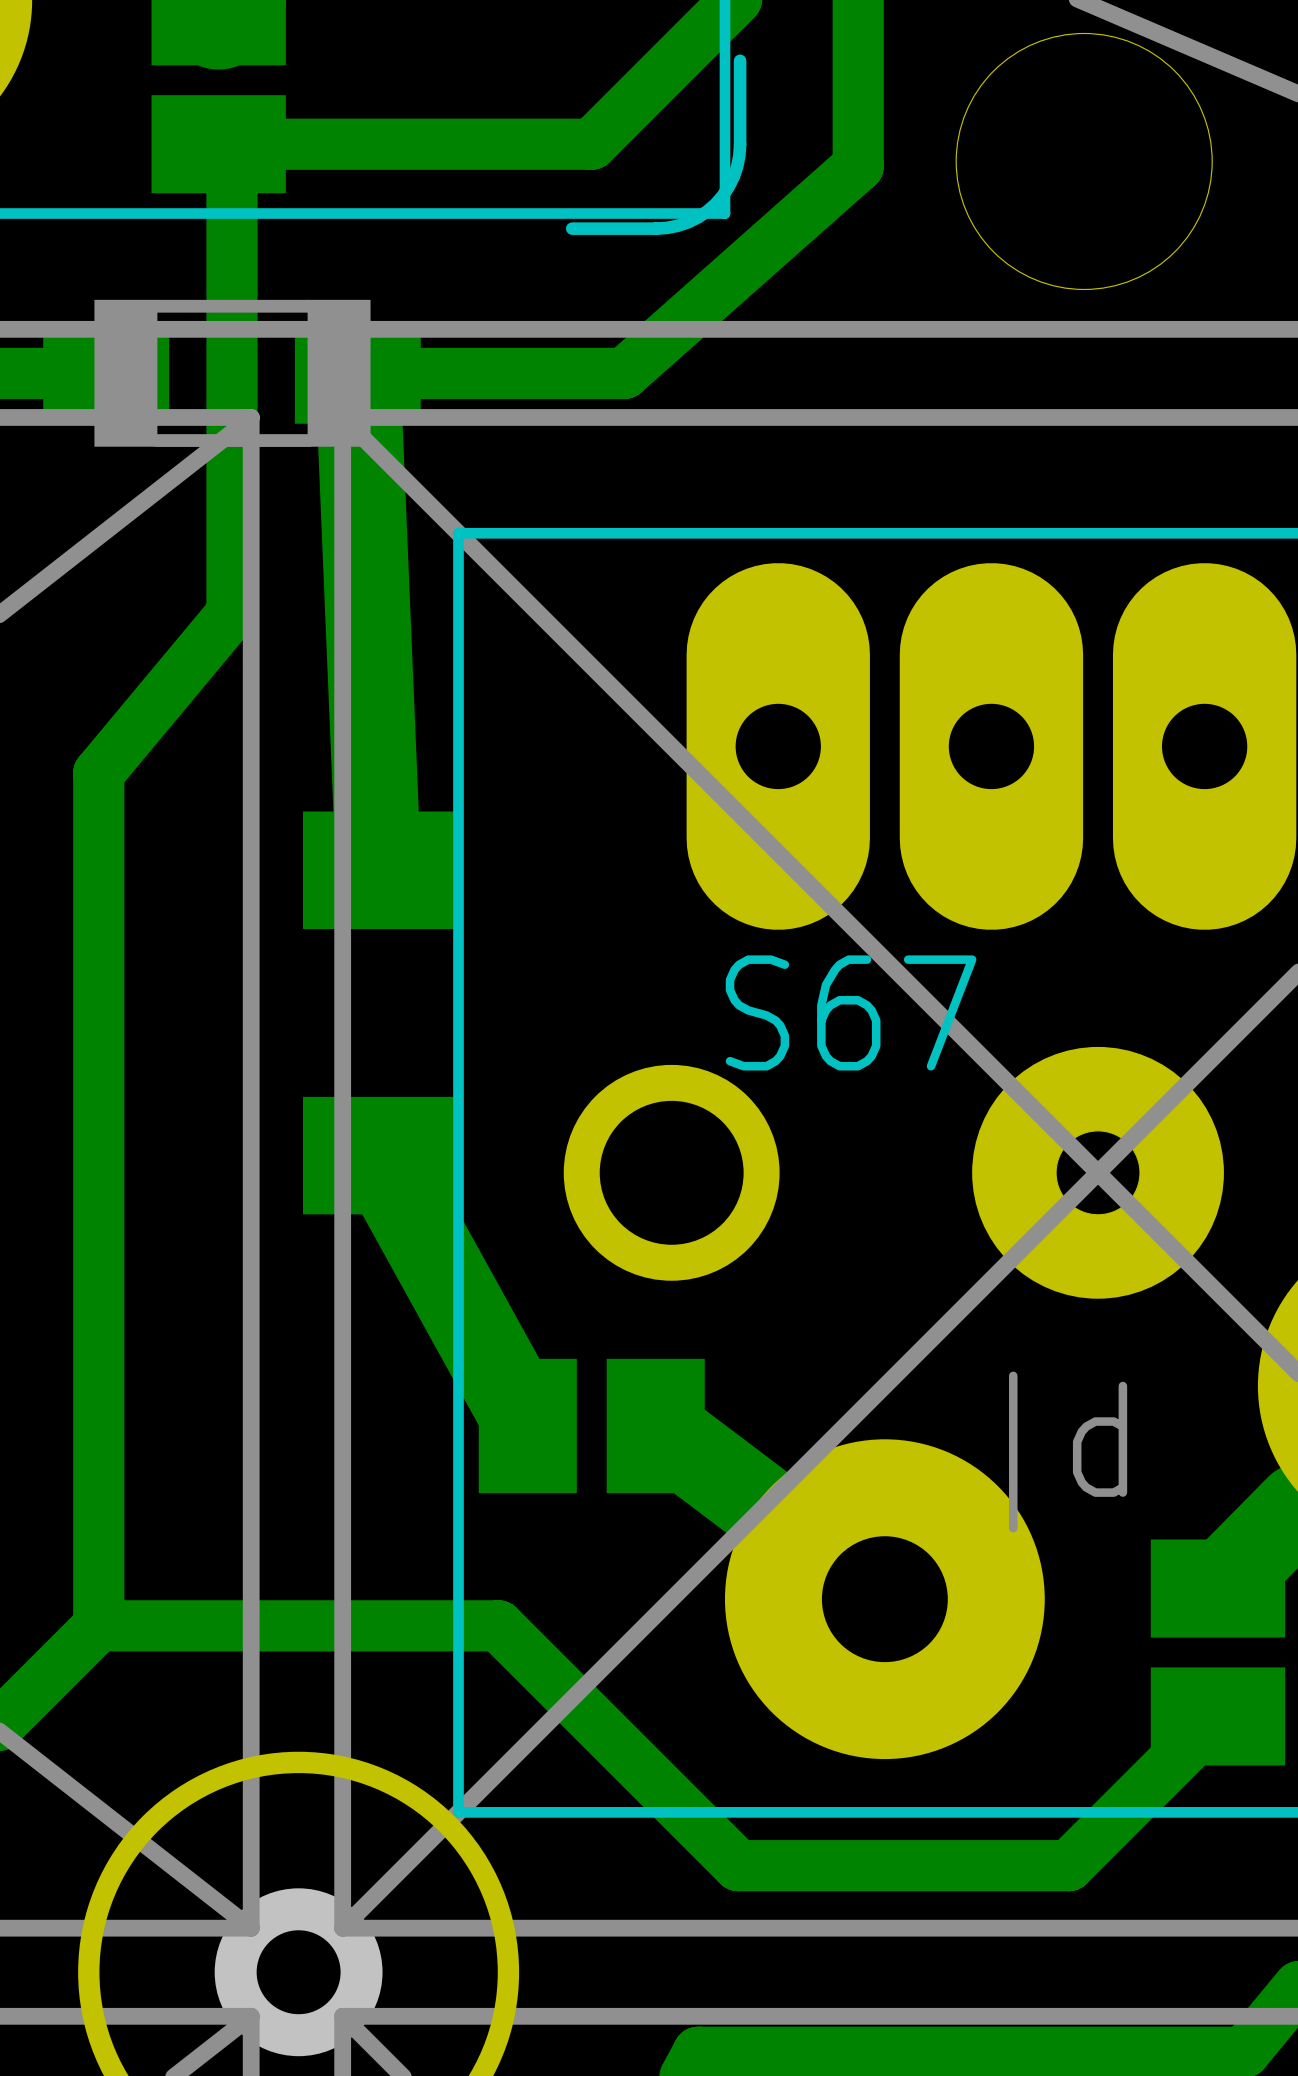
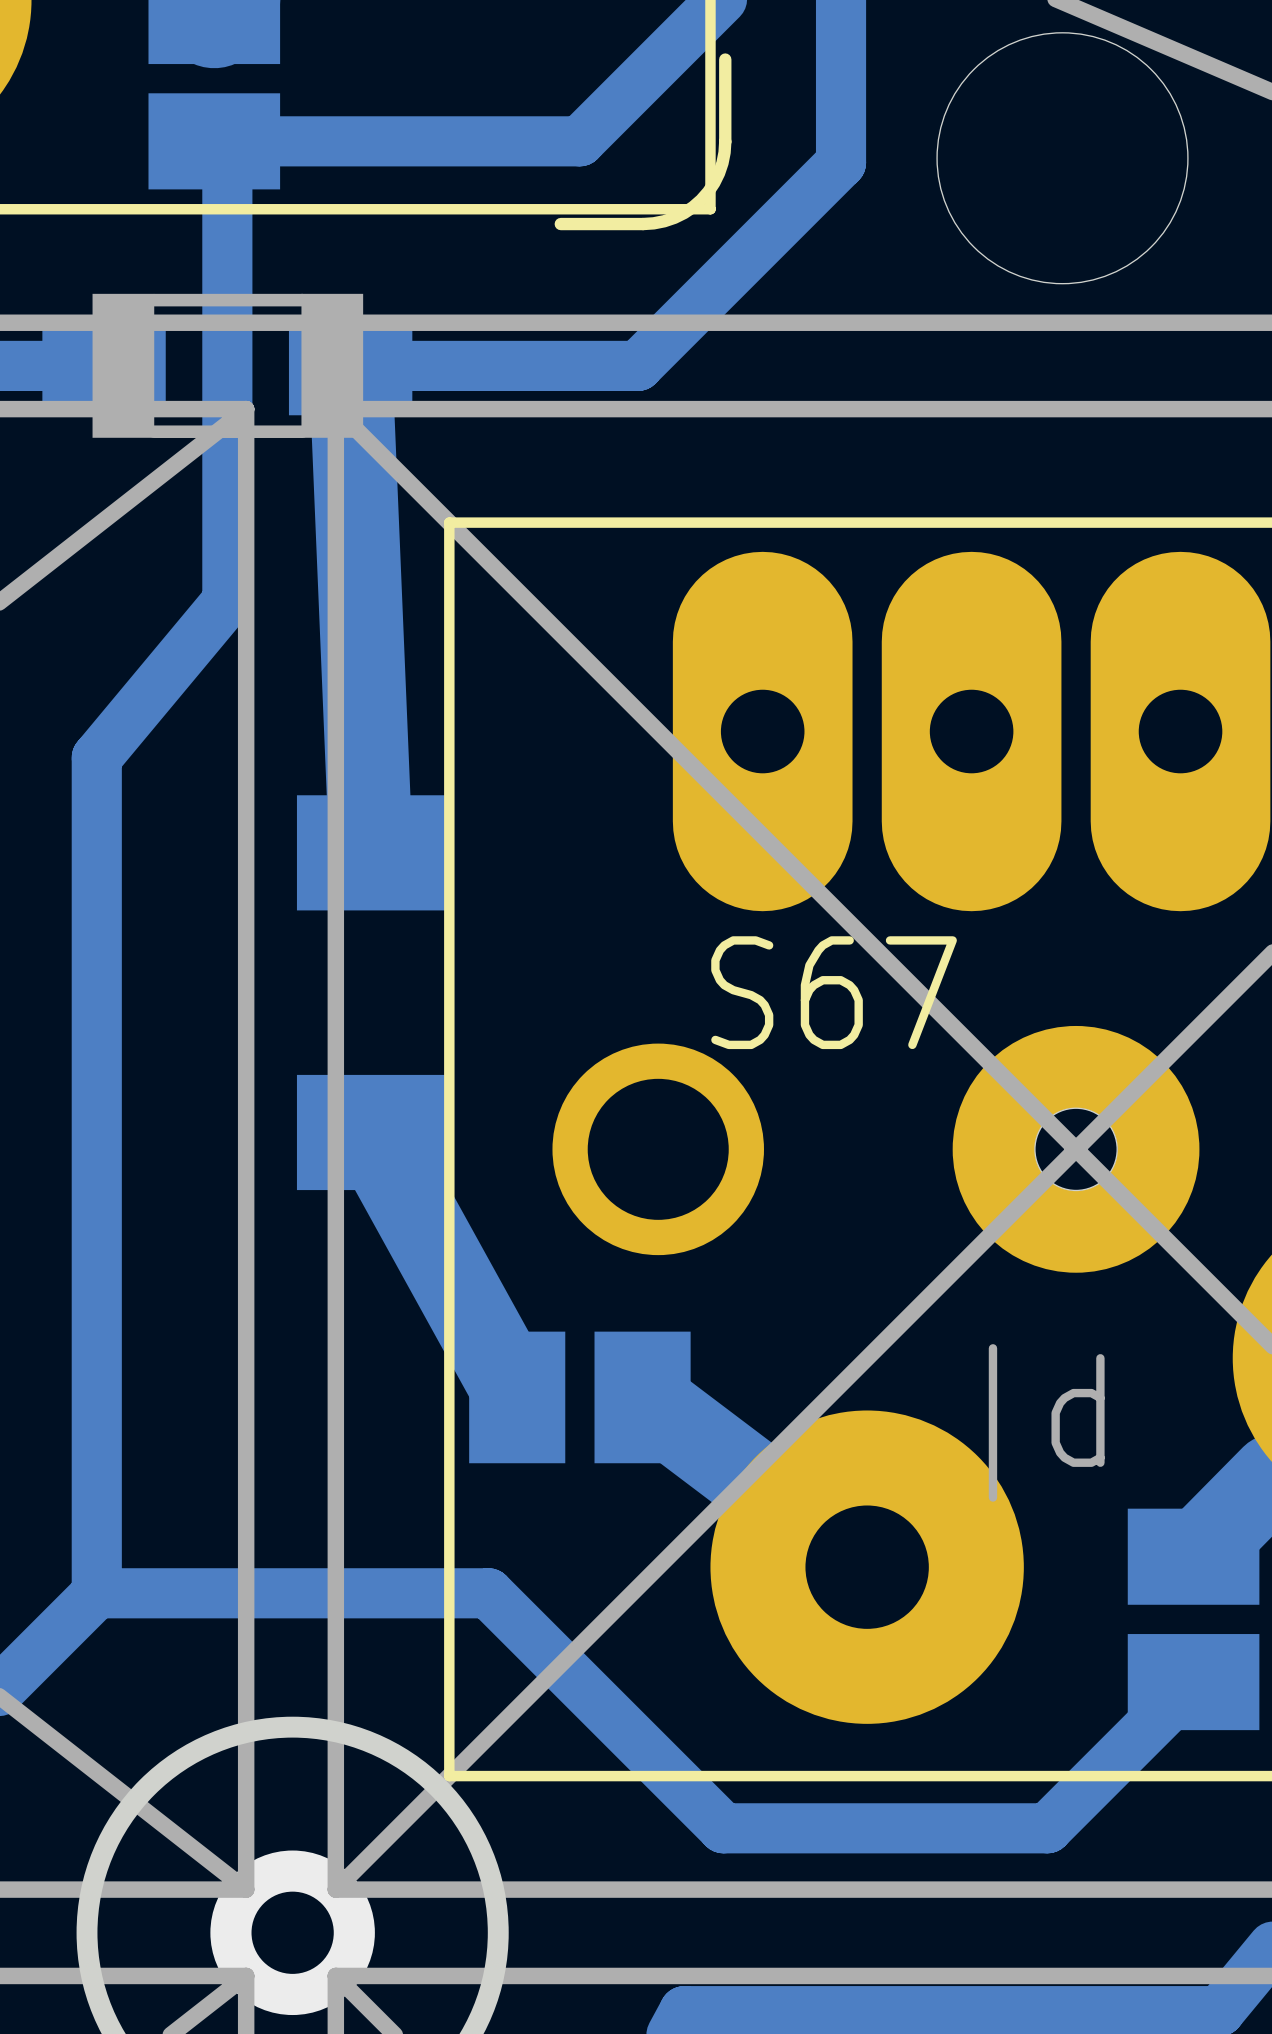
bottom track: (858, 166) (624, 373) -> (841, 162) (637, 365) (611, 365)

